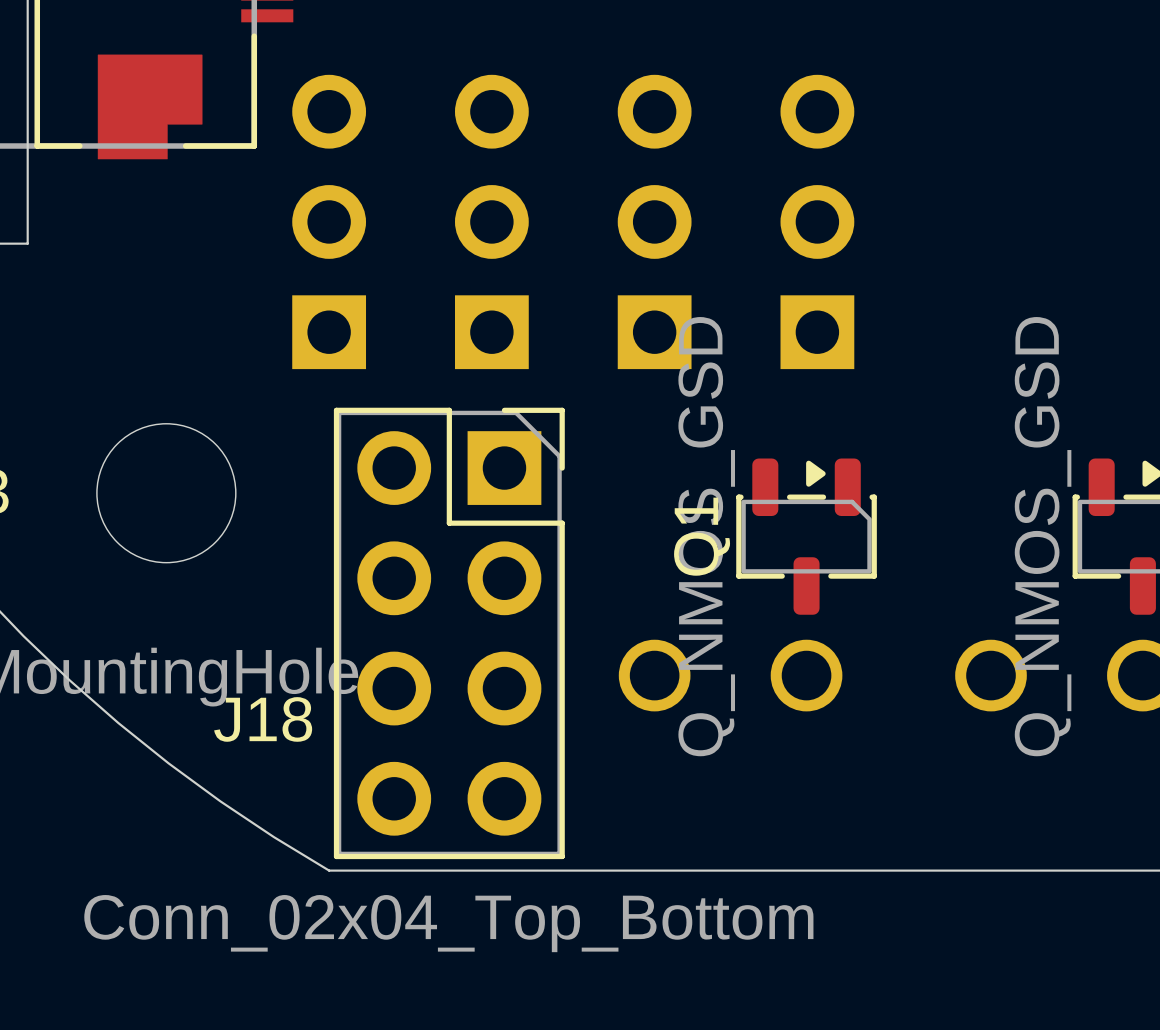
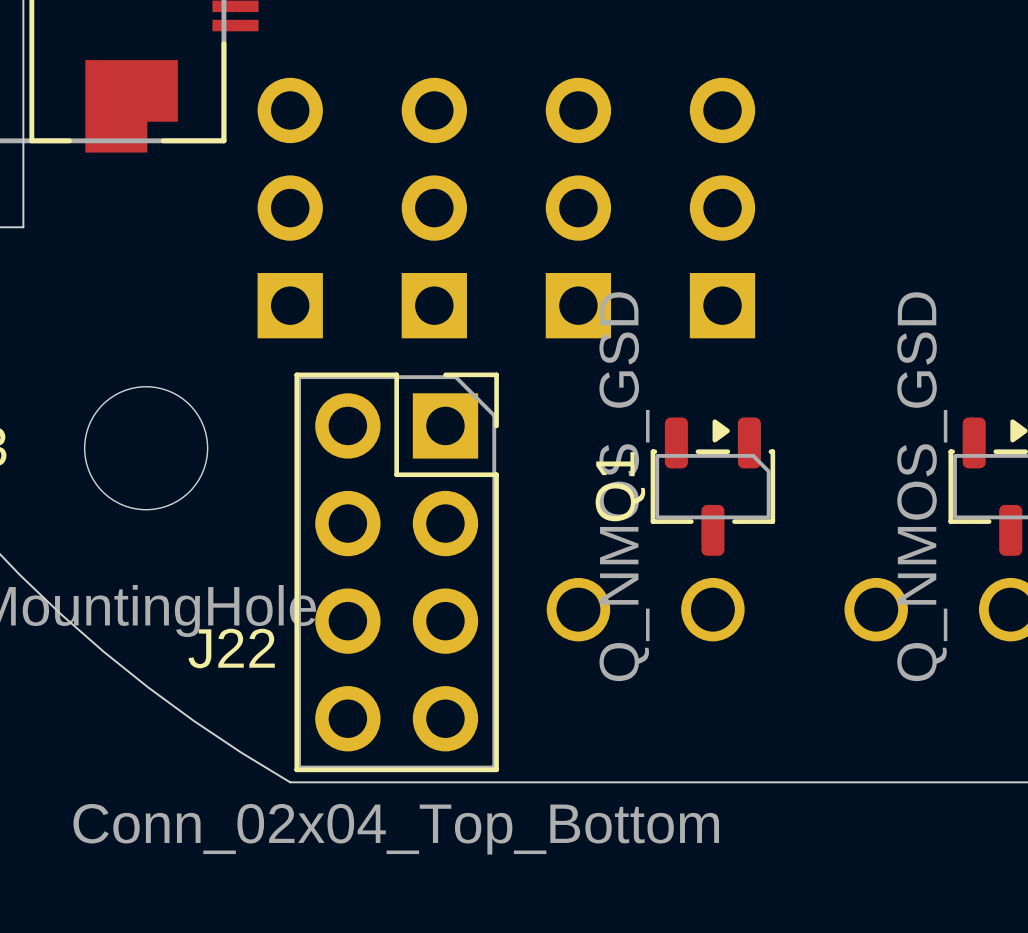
J18 name: J18 (263, 719) -> J22 (231, 648)

